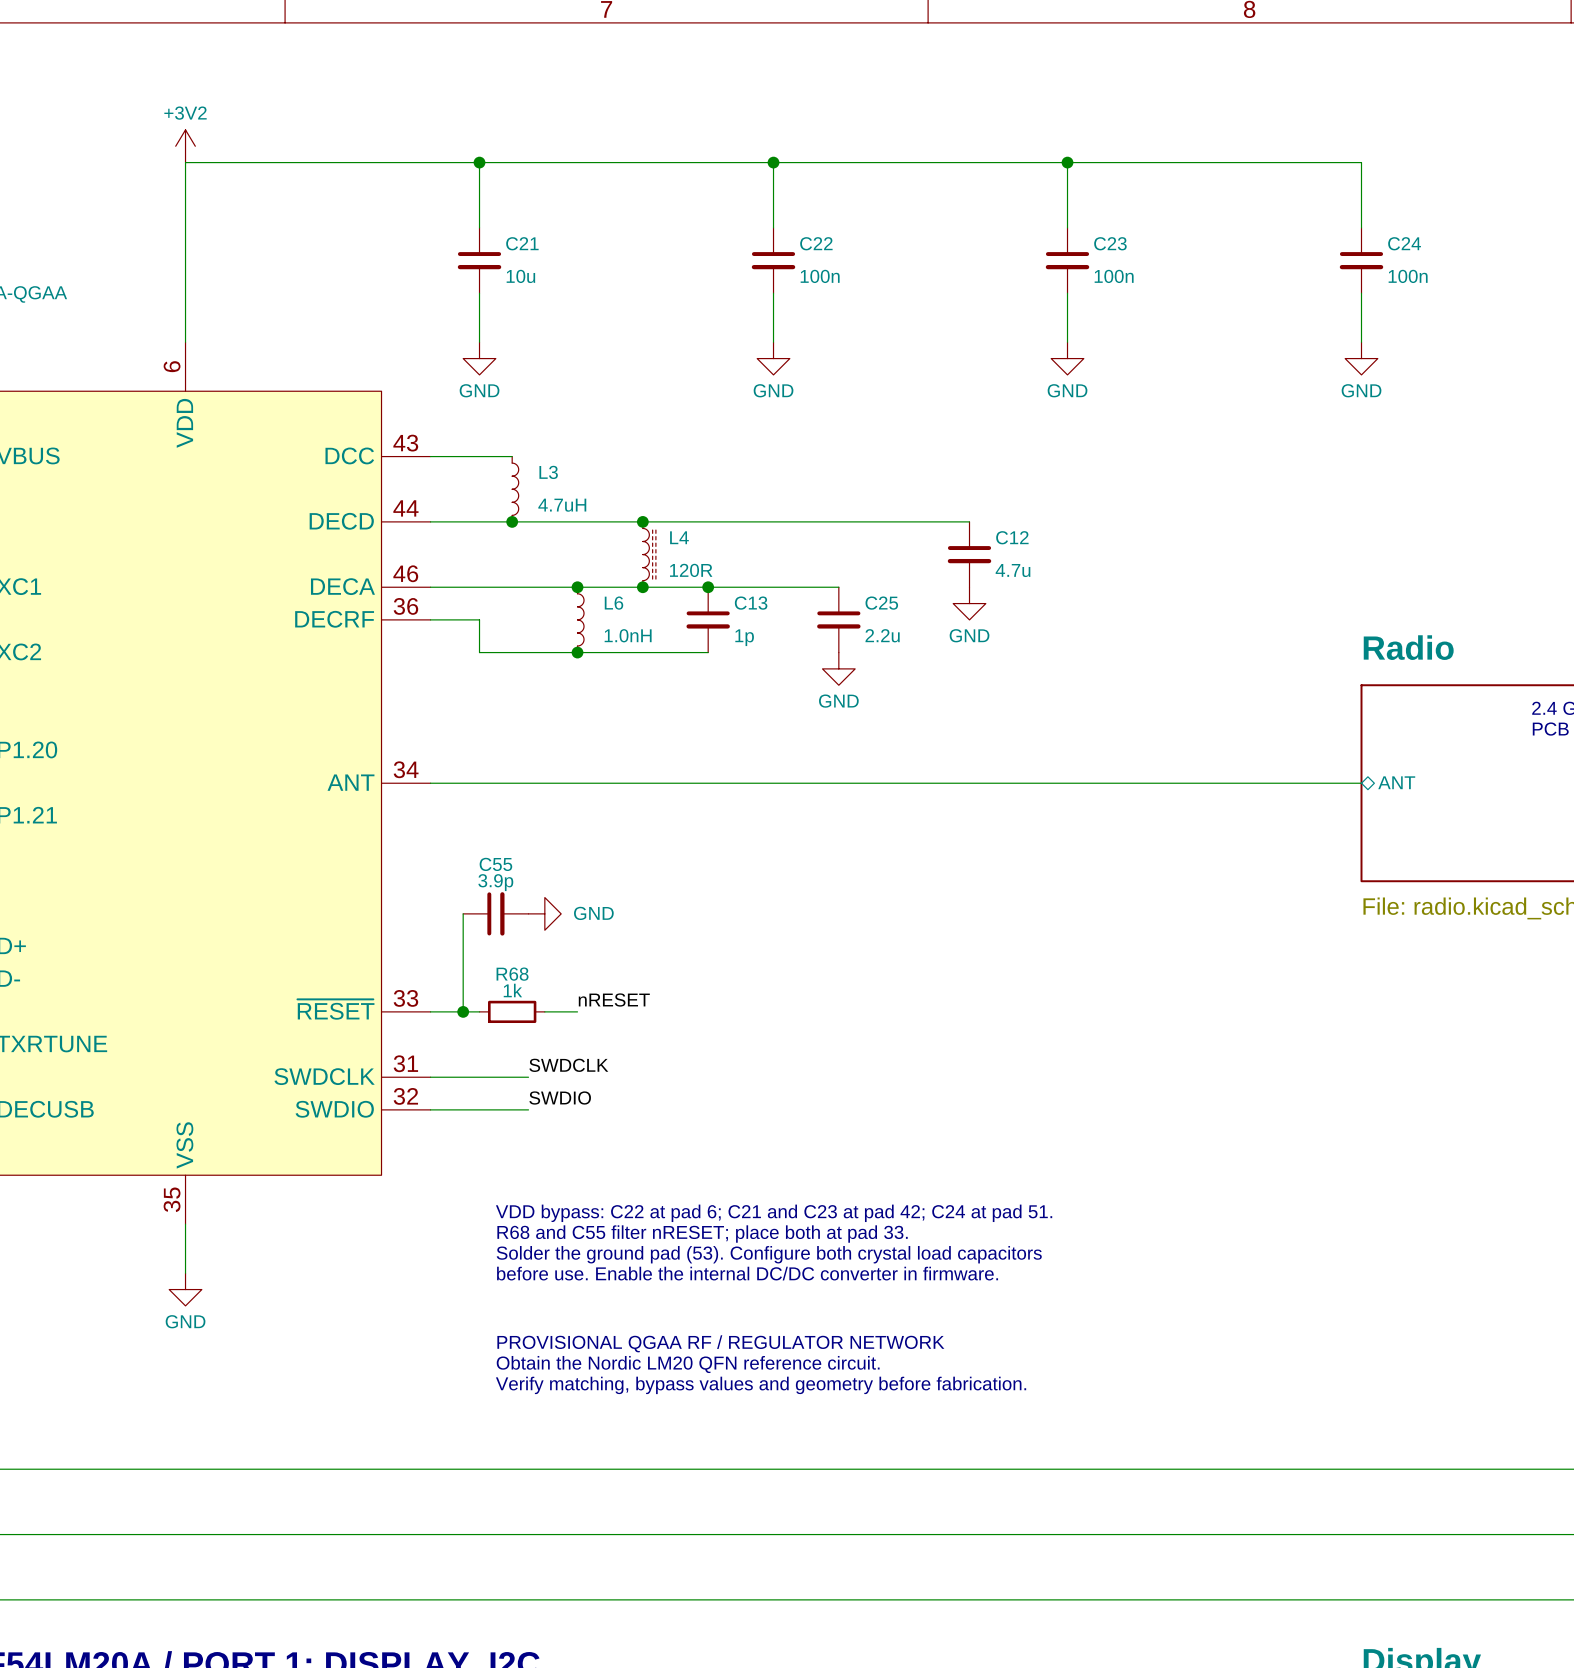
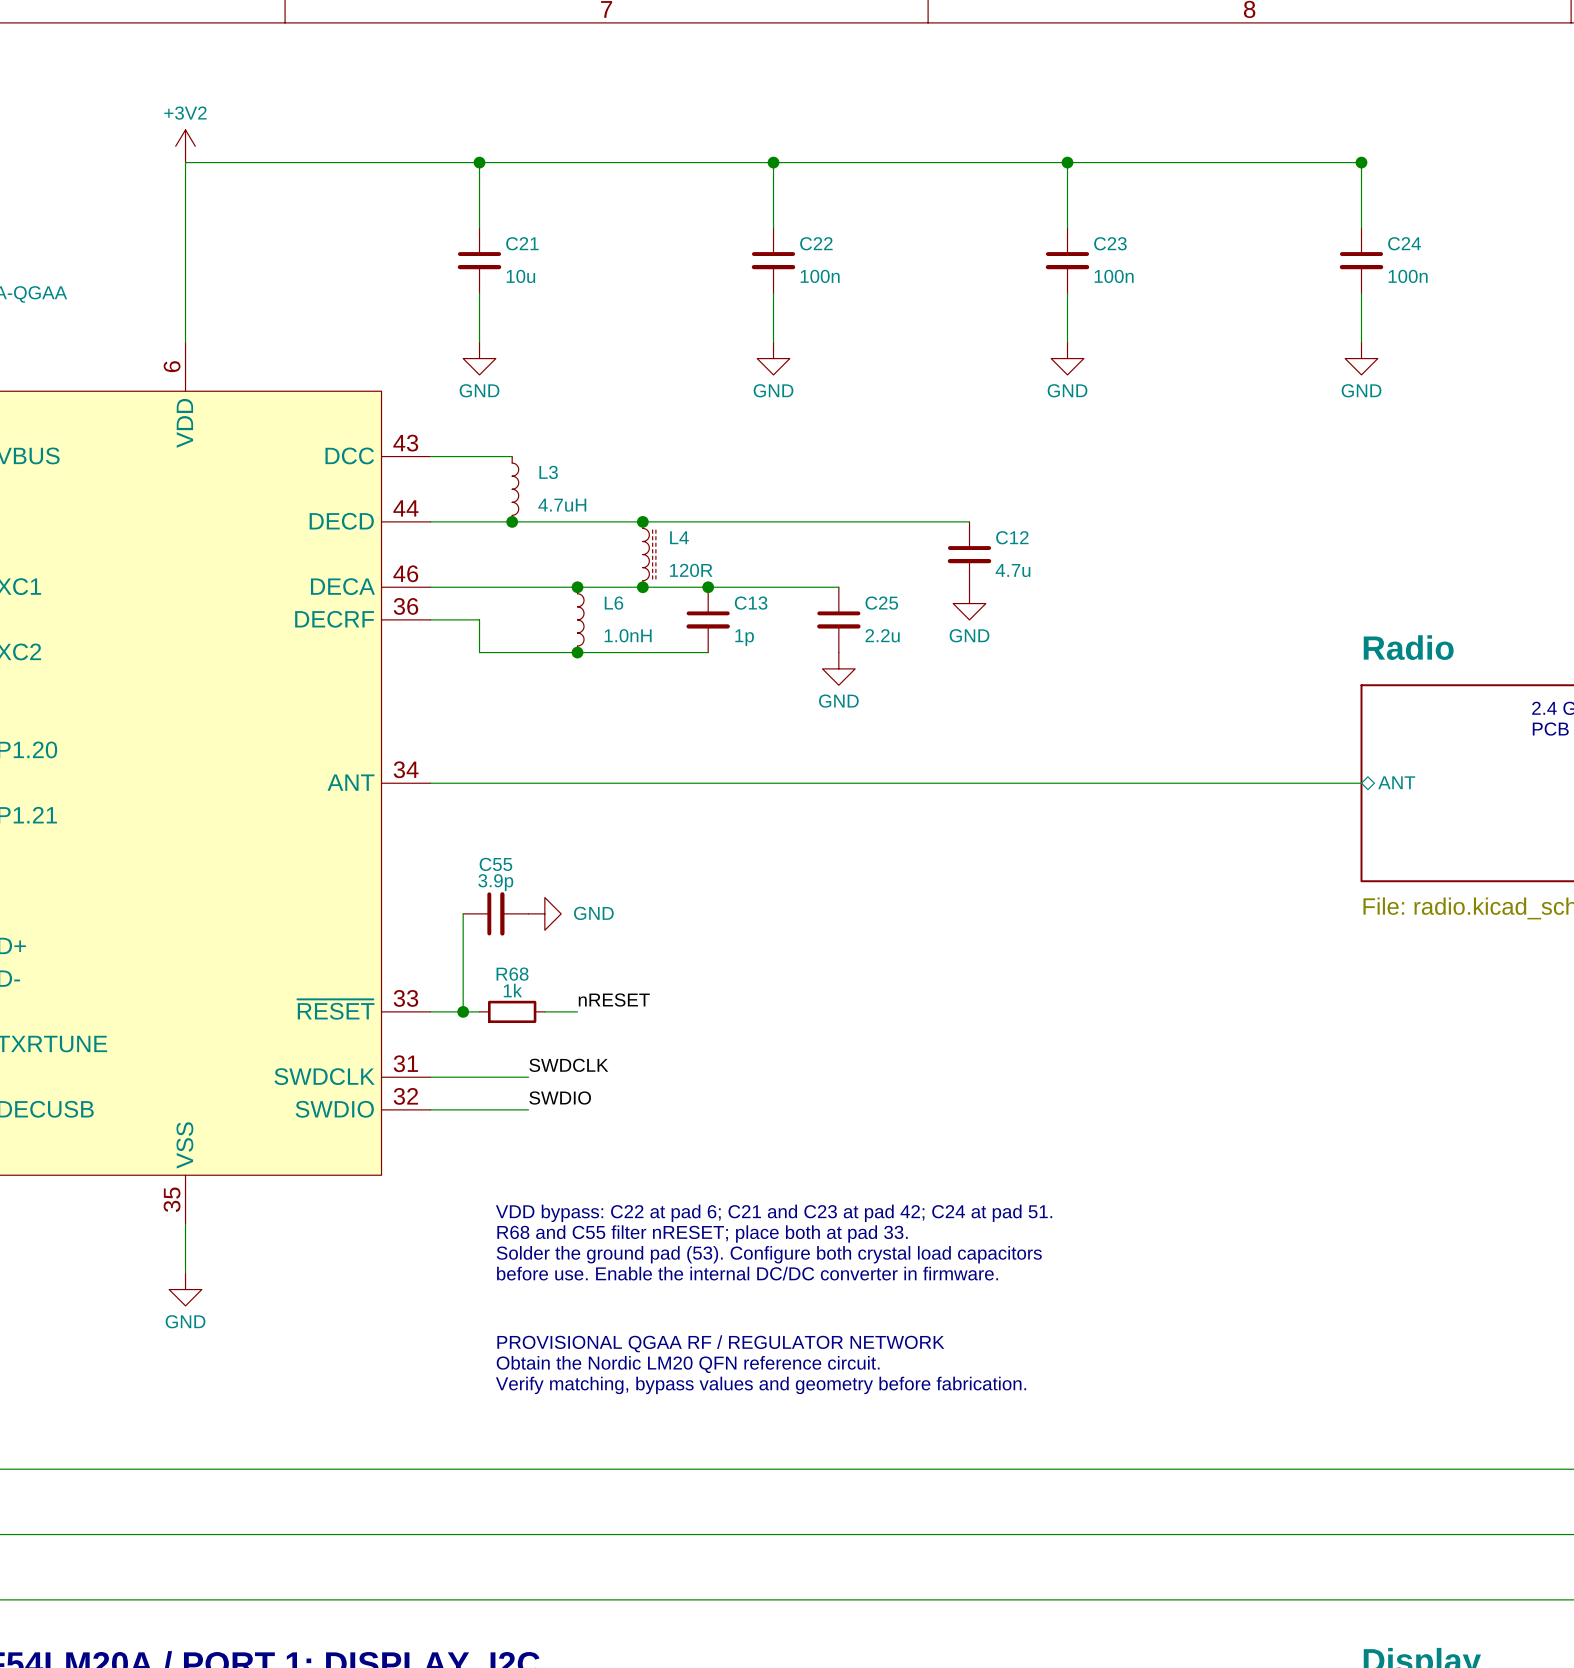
junction: none -> (1361, 162)

